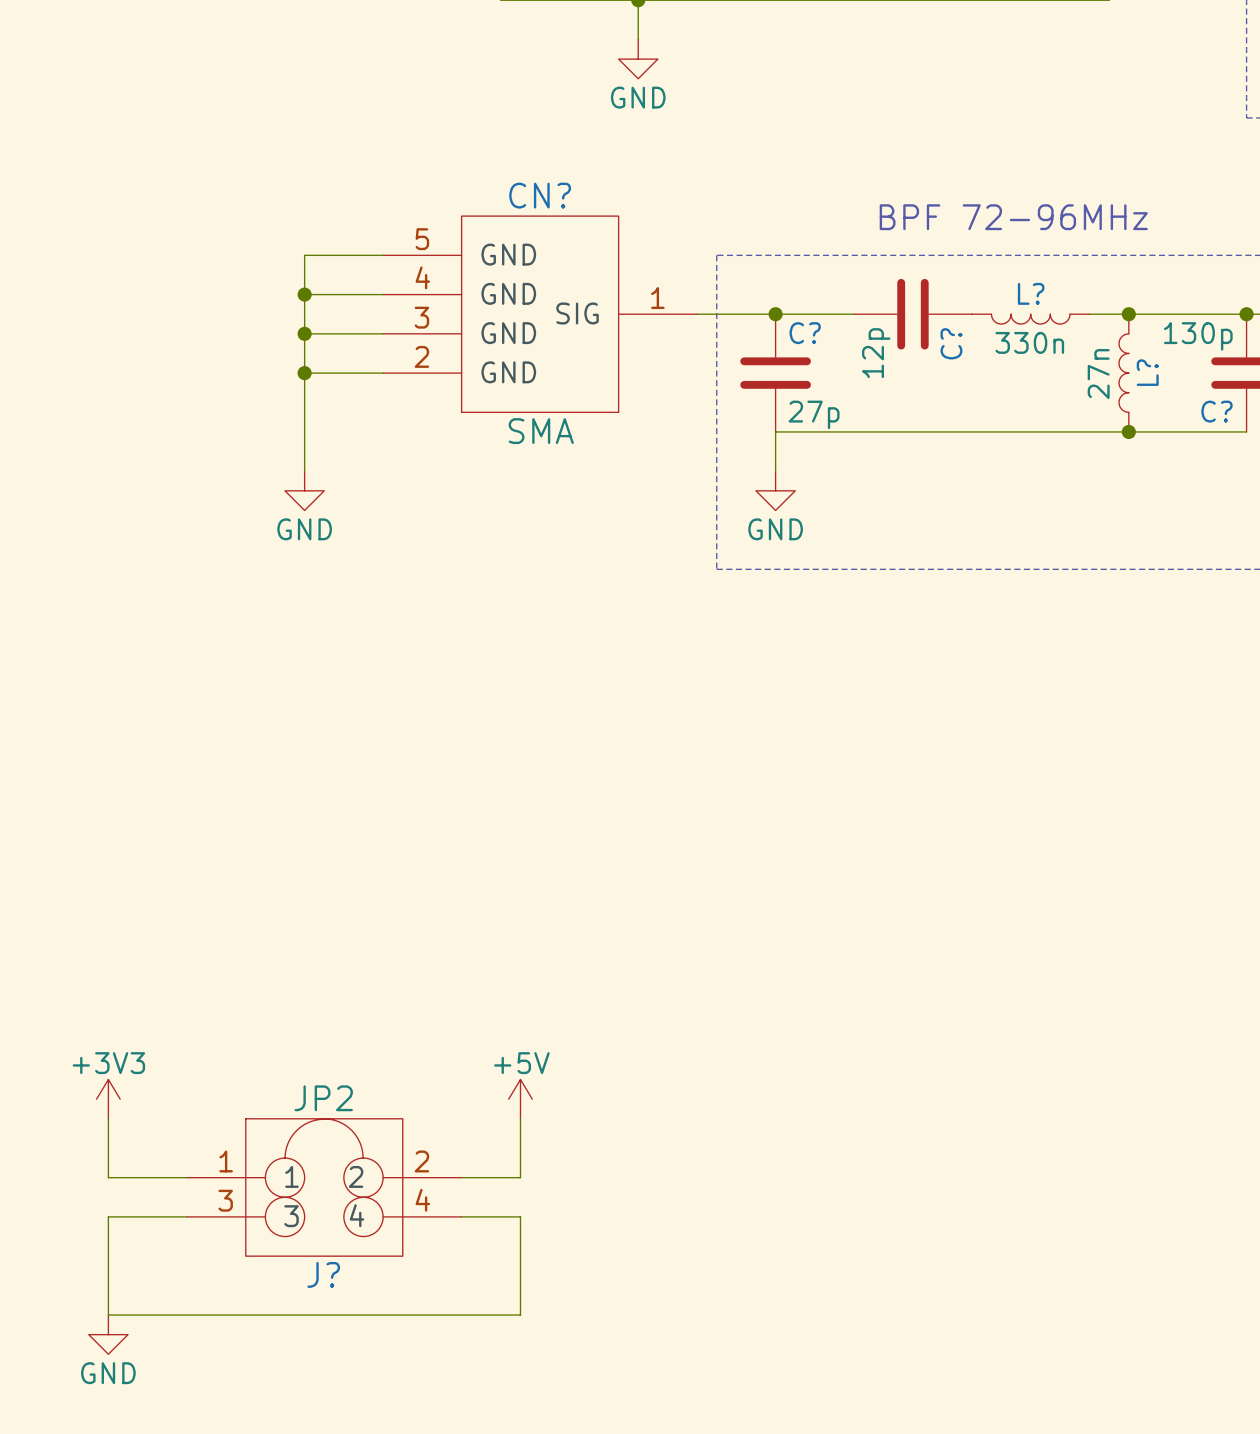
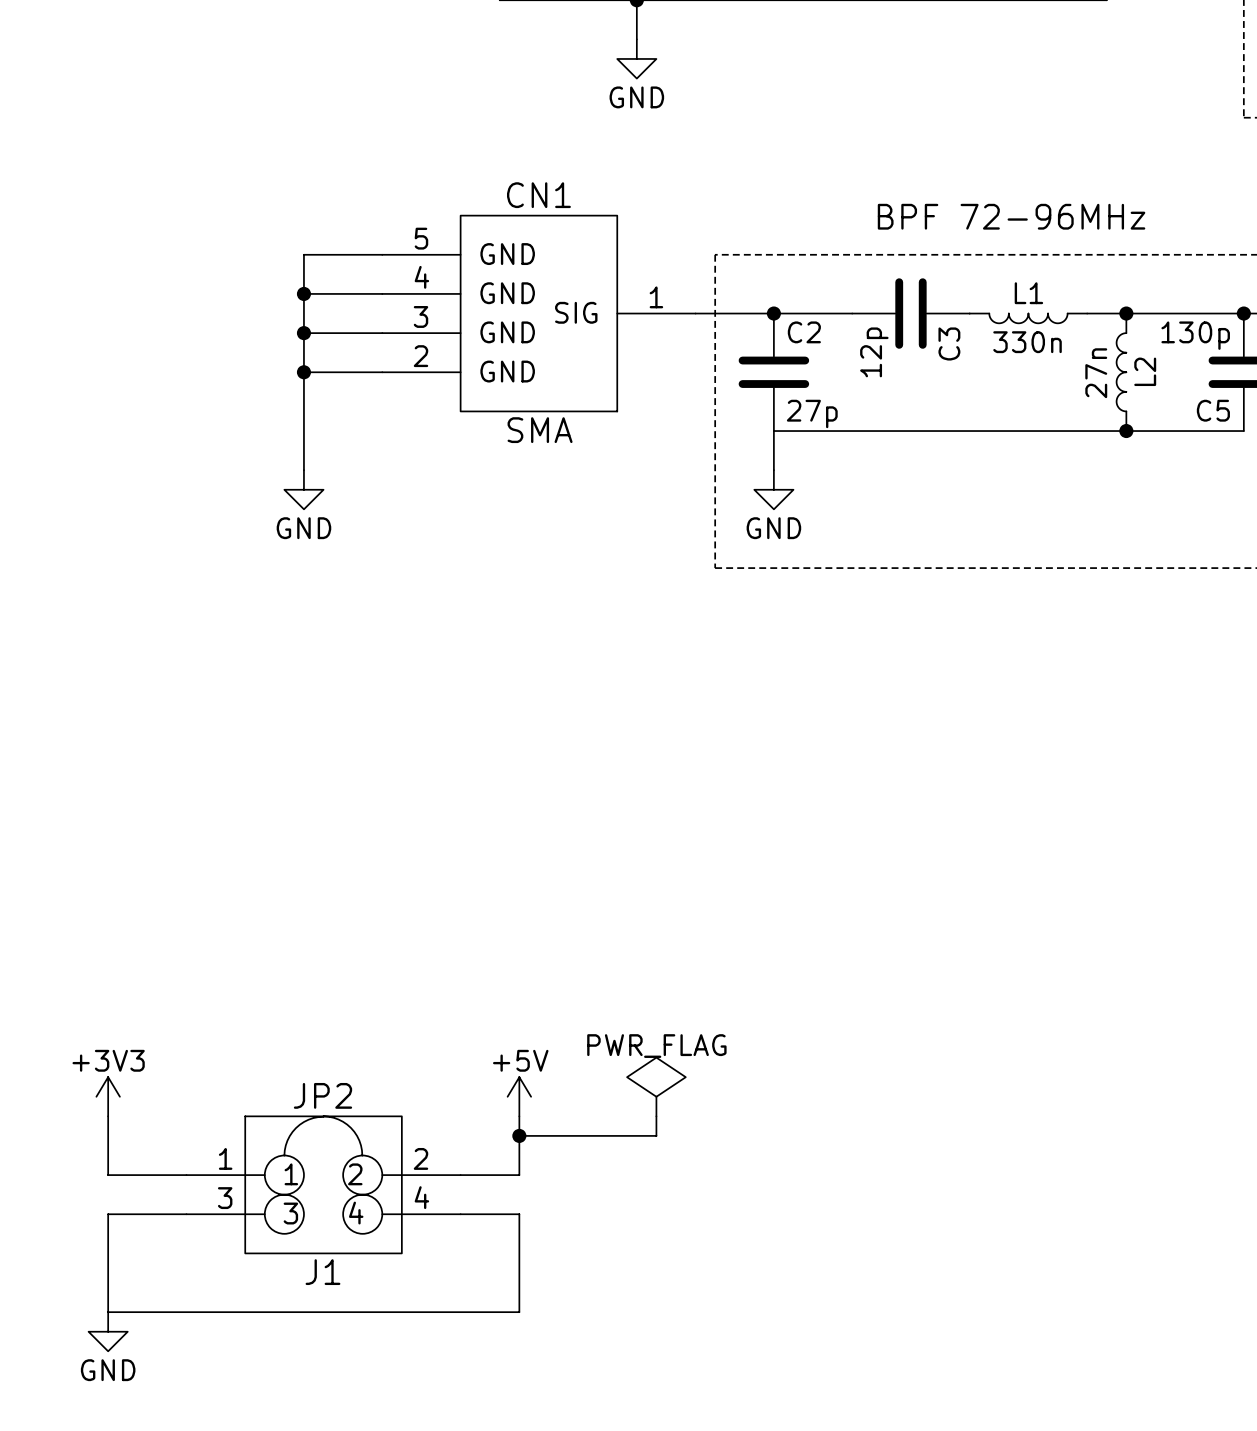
CN? name: CN? (540, 195) -> CN1 (538, 195)
L? name: L? (1031, 293) -> L1 (1028, 293)
C? name: C? (805, 333) -> C2 (804, 332)
C? name: C? (951, 343) -> C3 (949, 343)
L? name: L? (1147, 372) -> L2 (1145, 371)
C? name: C? (1216, 411) -> C5 (1213, 410)
power symbol: none -> PWR_FLAG (656, 1086)
wire: none -> (656, 1116) (656, 1135) (519, 1135)
junction: none -> (519, 1135)
J? name: J? (323, 1274) -> J1 (322, 1272)

